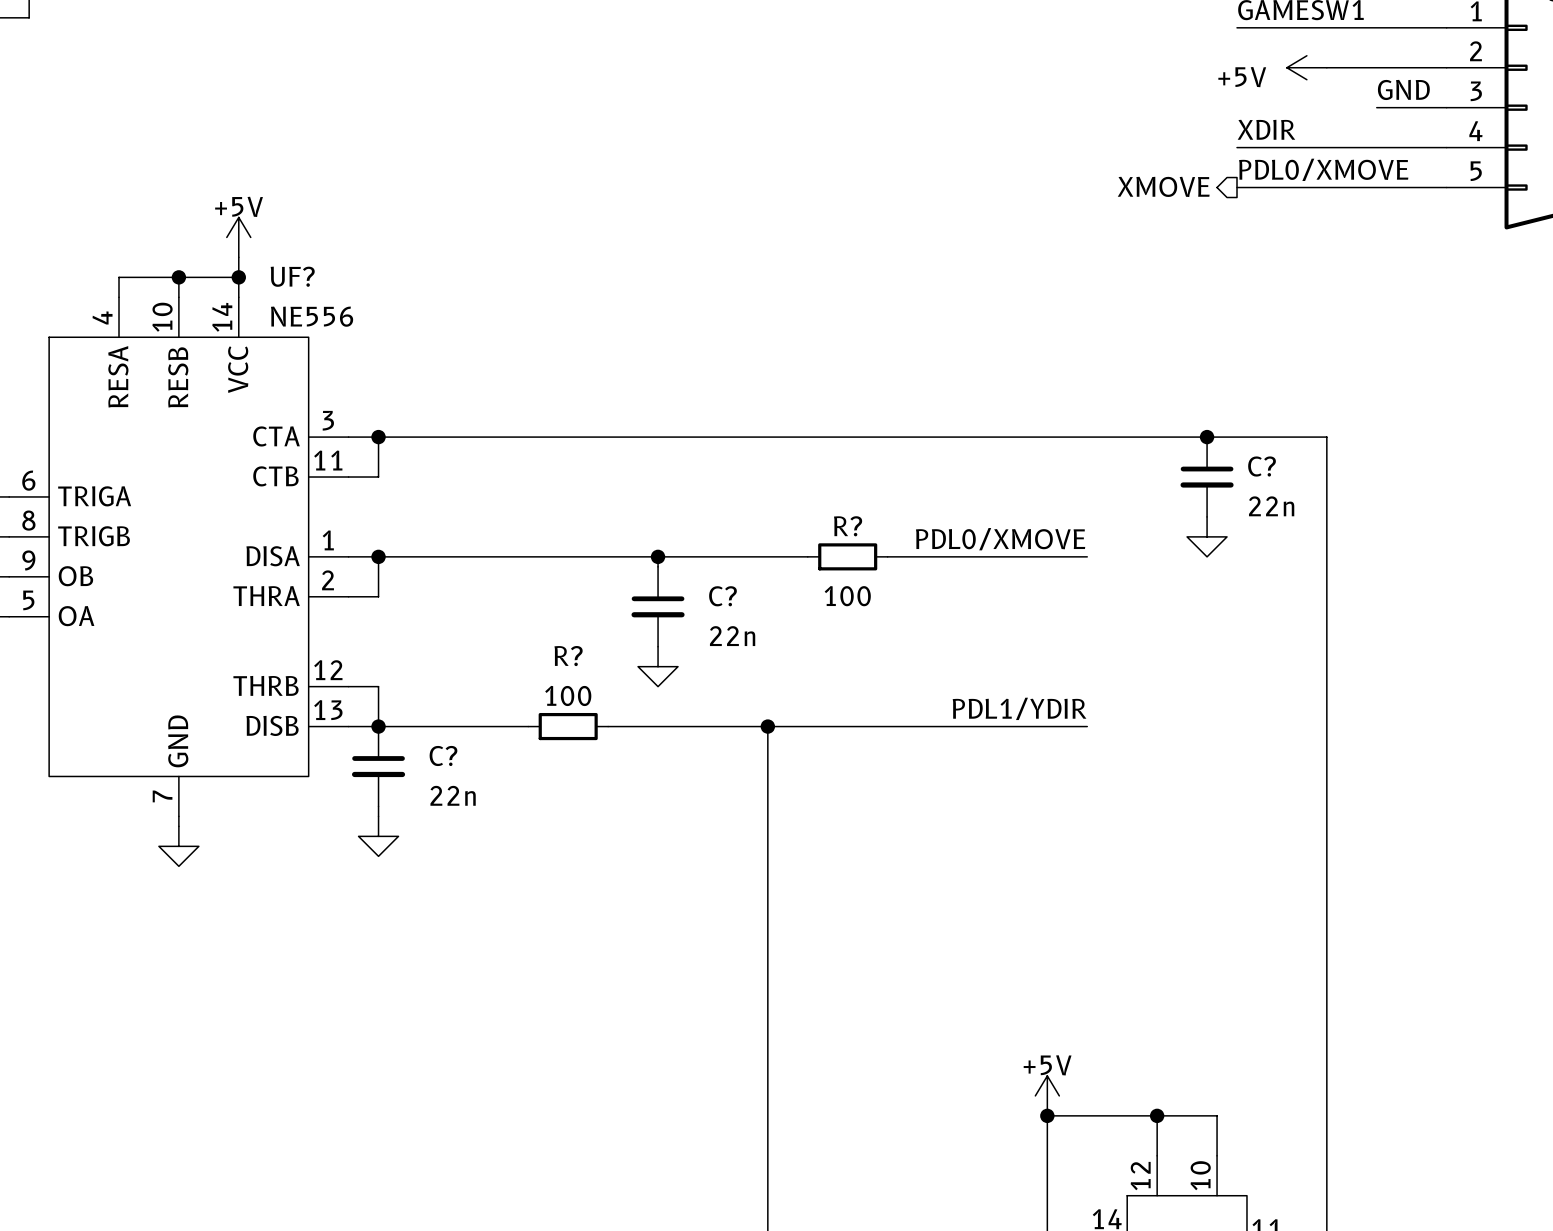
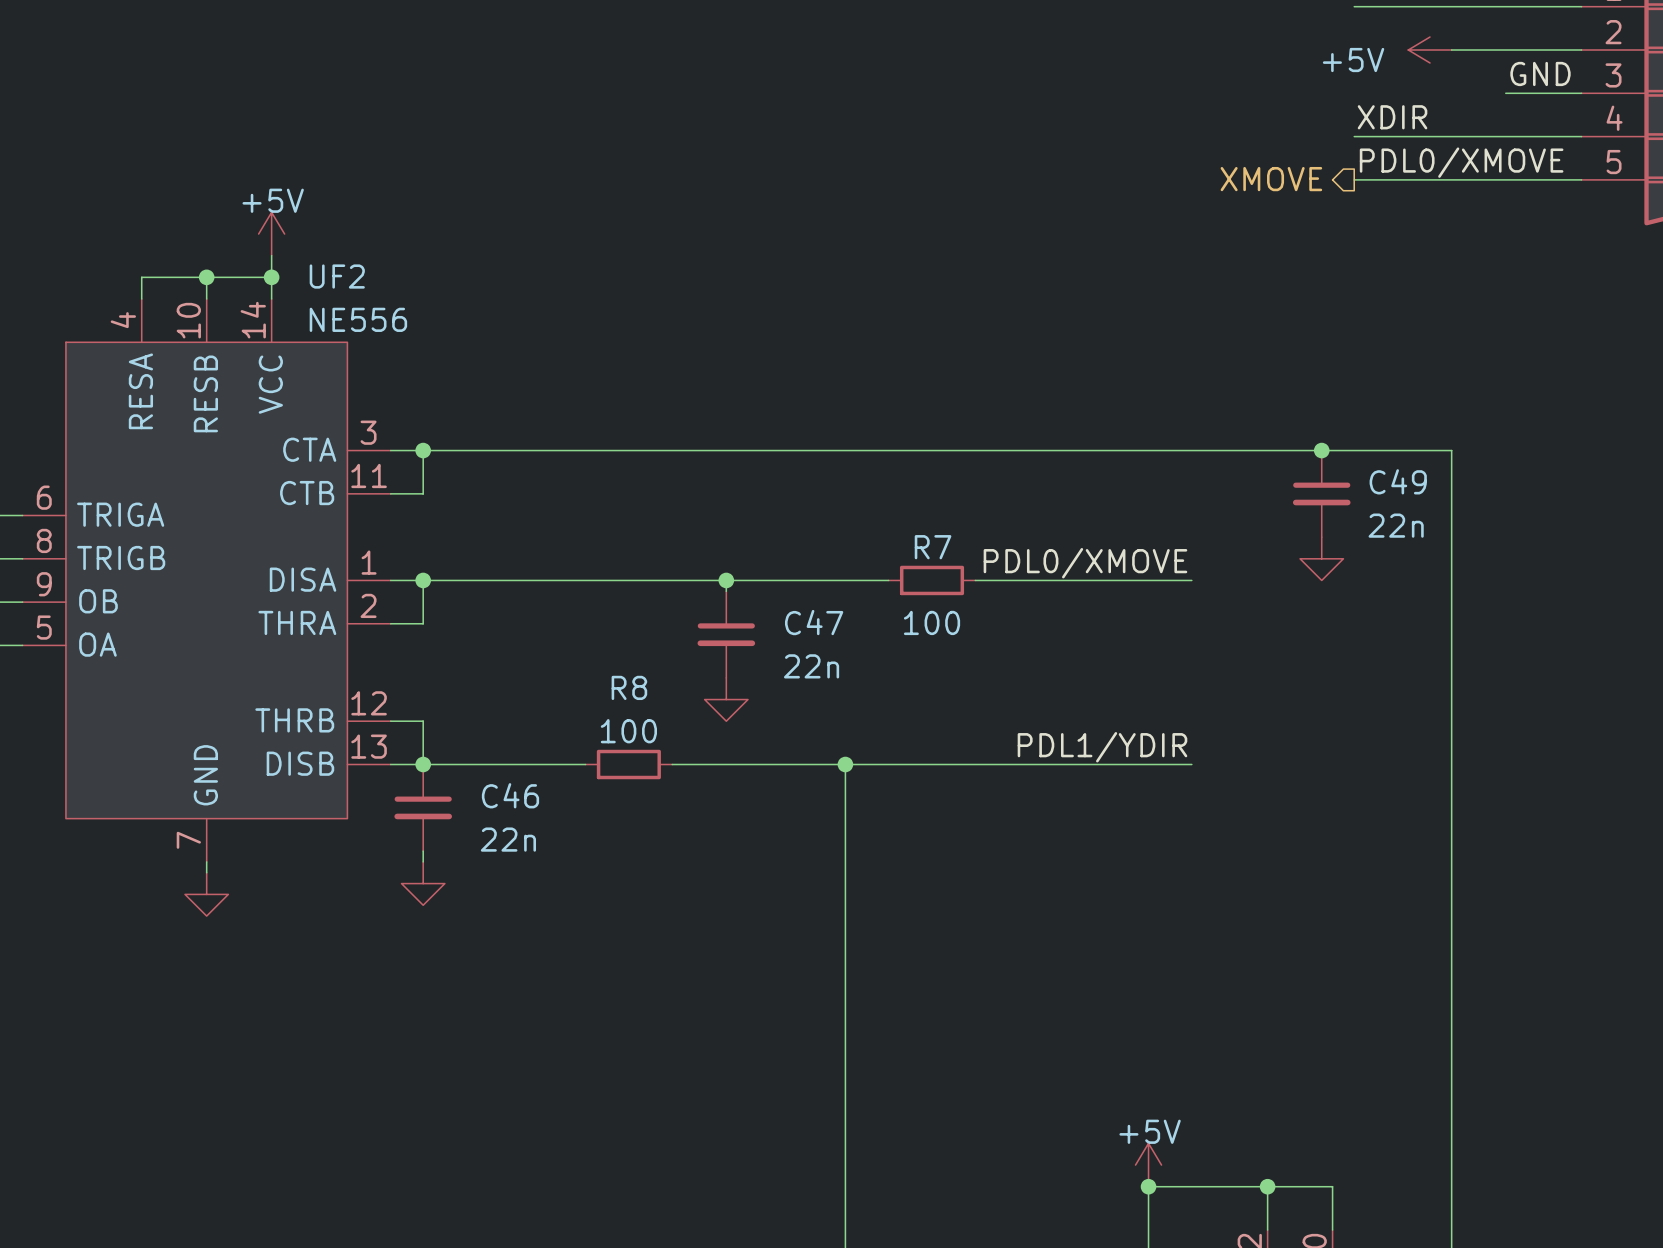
UF? name: UF? (292, 276) -> UF2 (337, 276)
C? name: C? (1262, 466) -> C49 (1398, 481)
R? name: R? (848, 526) -> R7 (933, 547)
C? name: C? (722, 596) -> C47 (814, 622)
R? name: R? (568, 656) -> R8 (629, 687)
C? name: C? (443, 755) -> C46 (510, 795)

